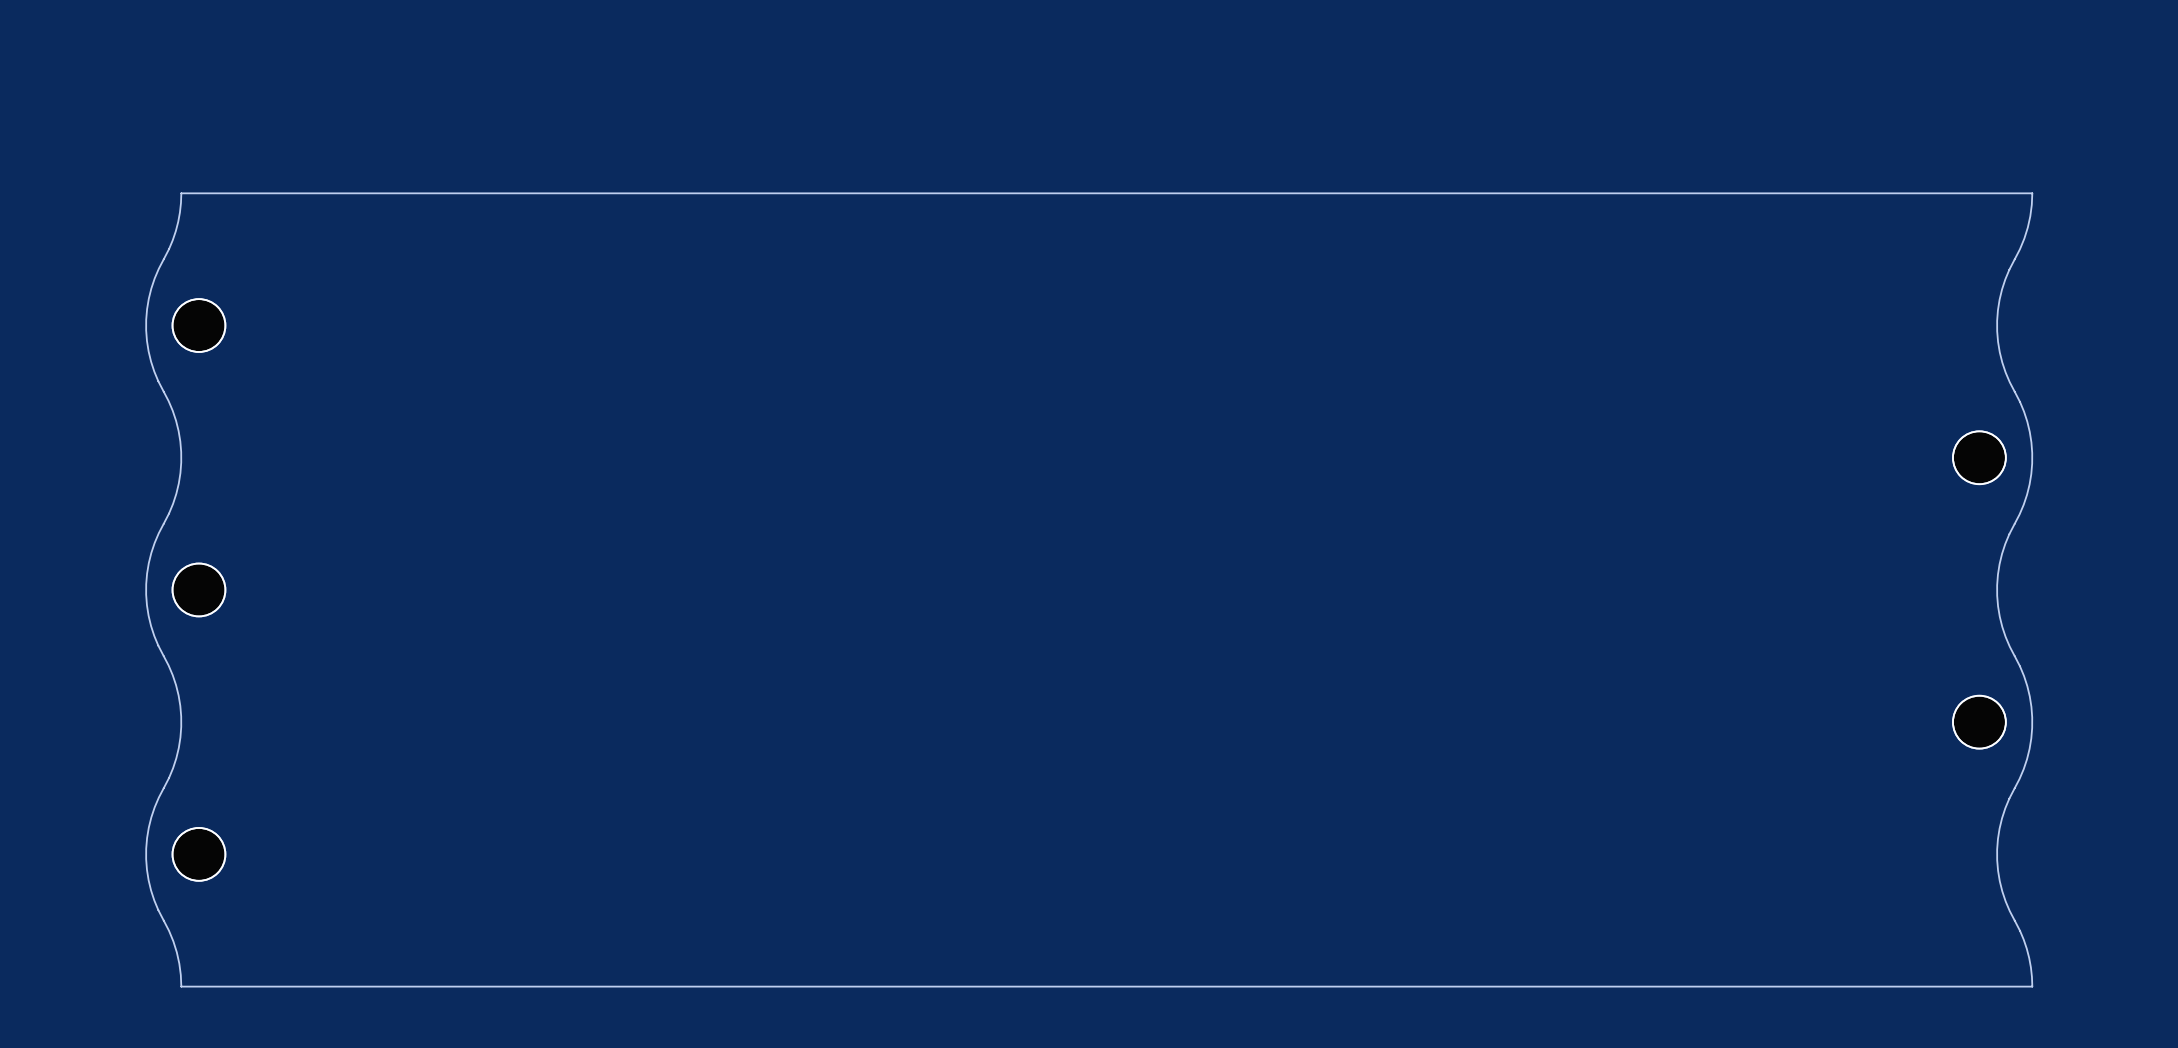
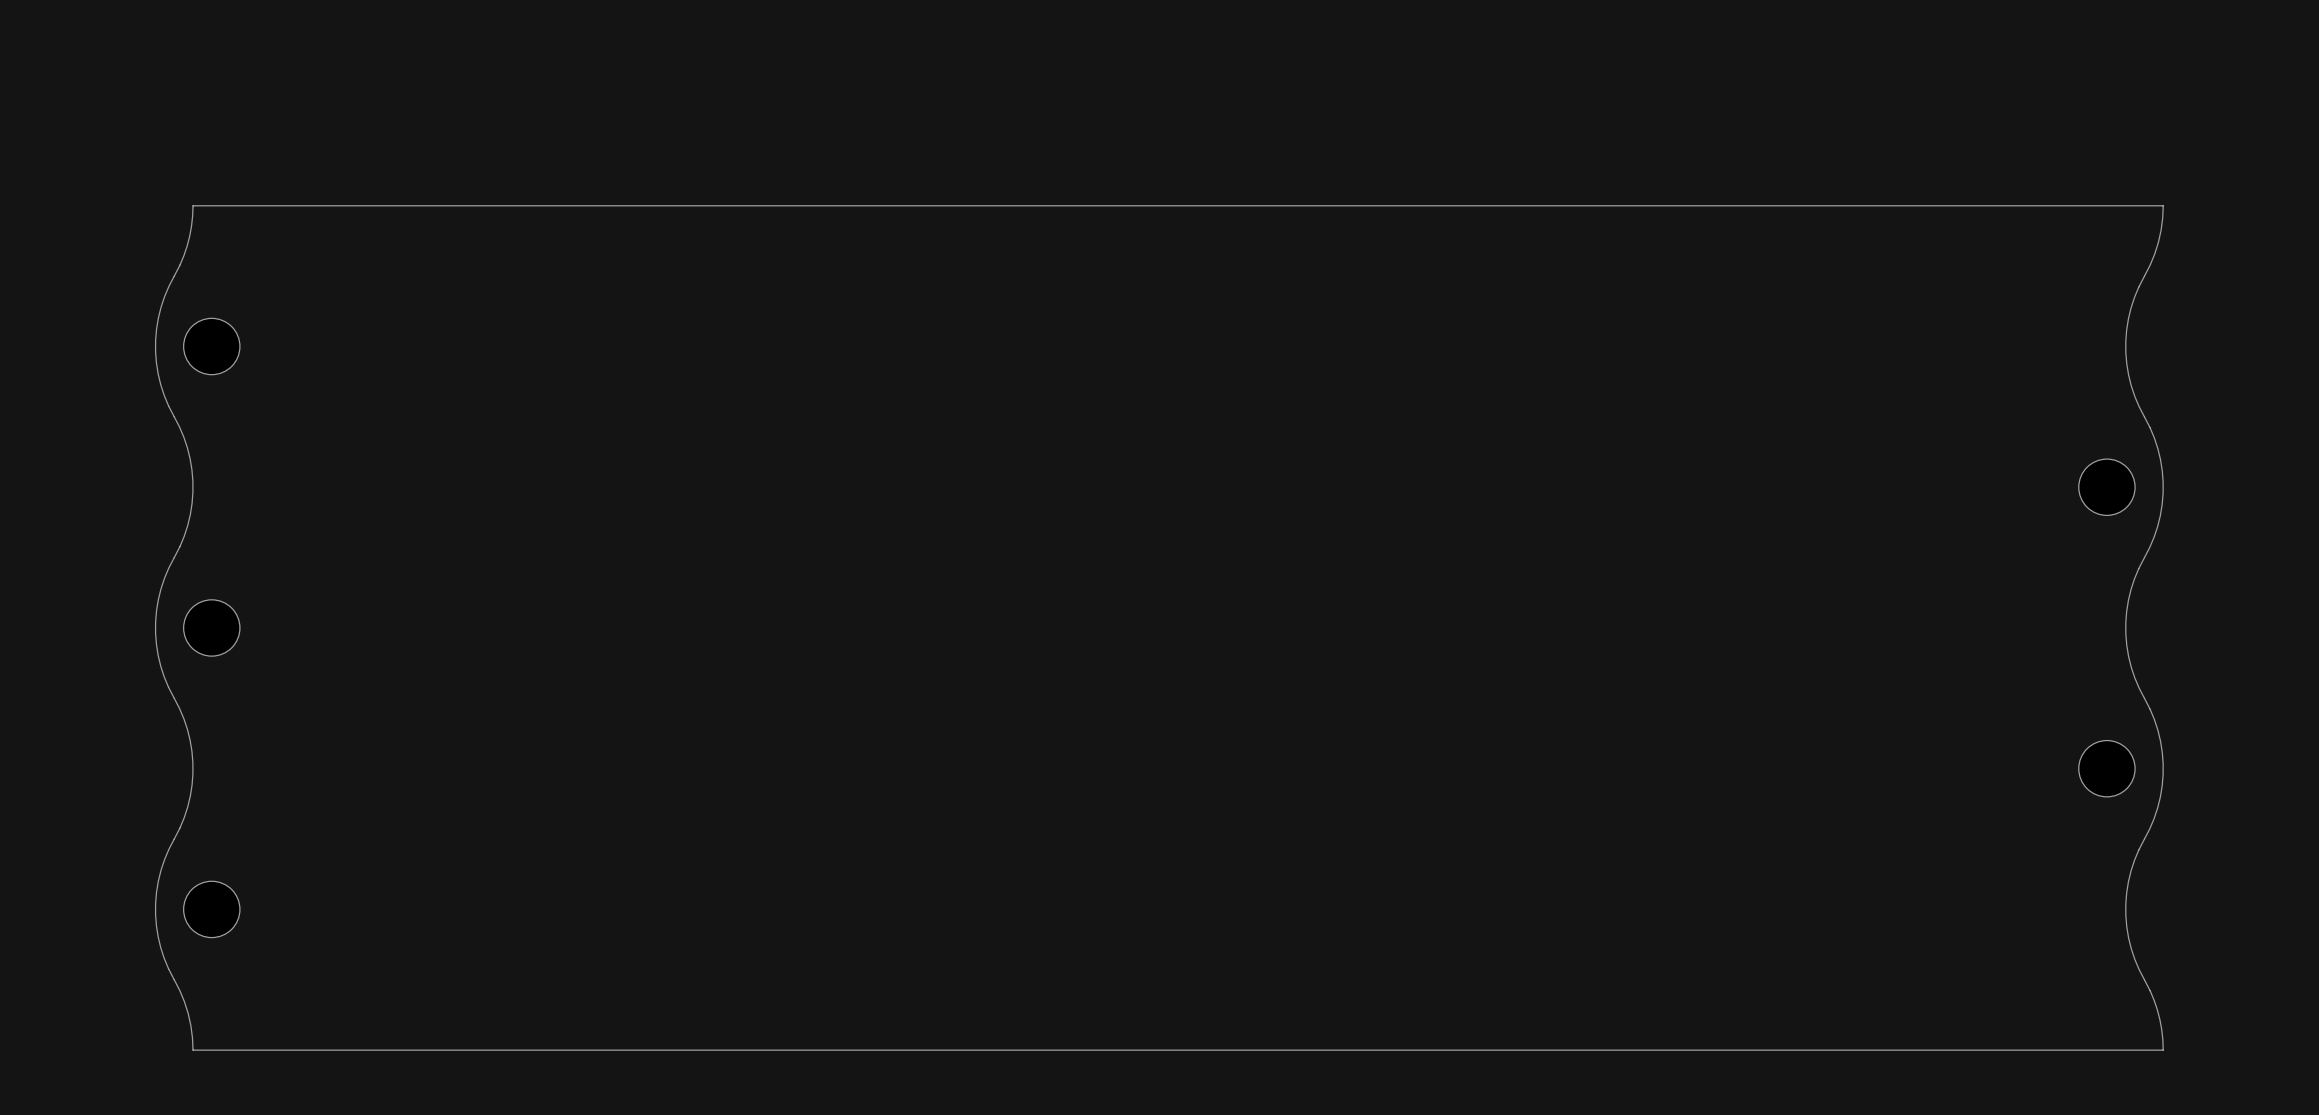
drawing: [172, 299, 226, 352] -> none
drawing: [1952, 431, 2006, 485] -> none
drawing: [172, 563, 226, 617] -> none
drawing: [1952, 695, 2006, 749] -> none
drawing: [172, 827, 226, 881] -> none

